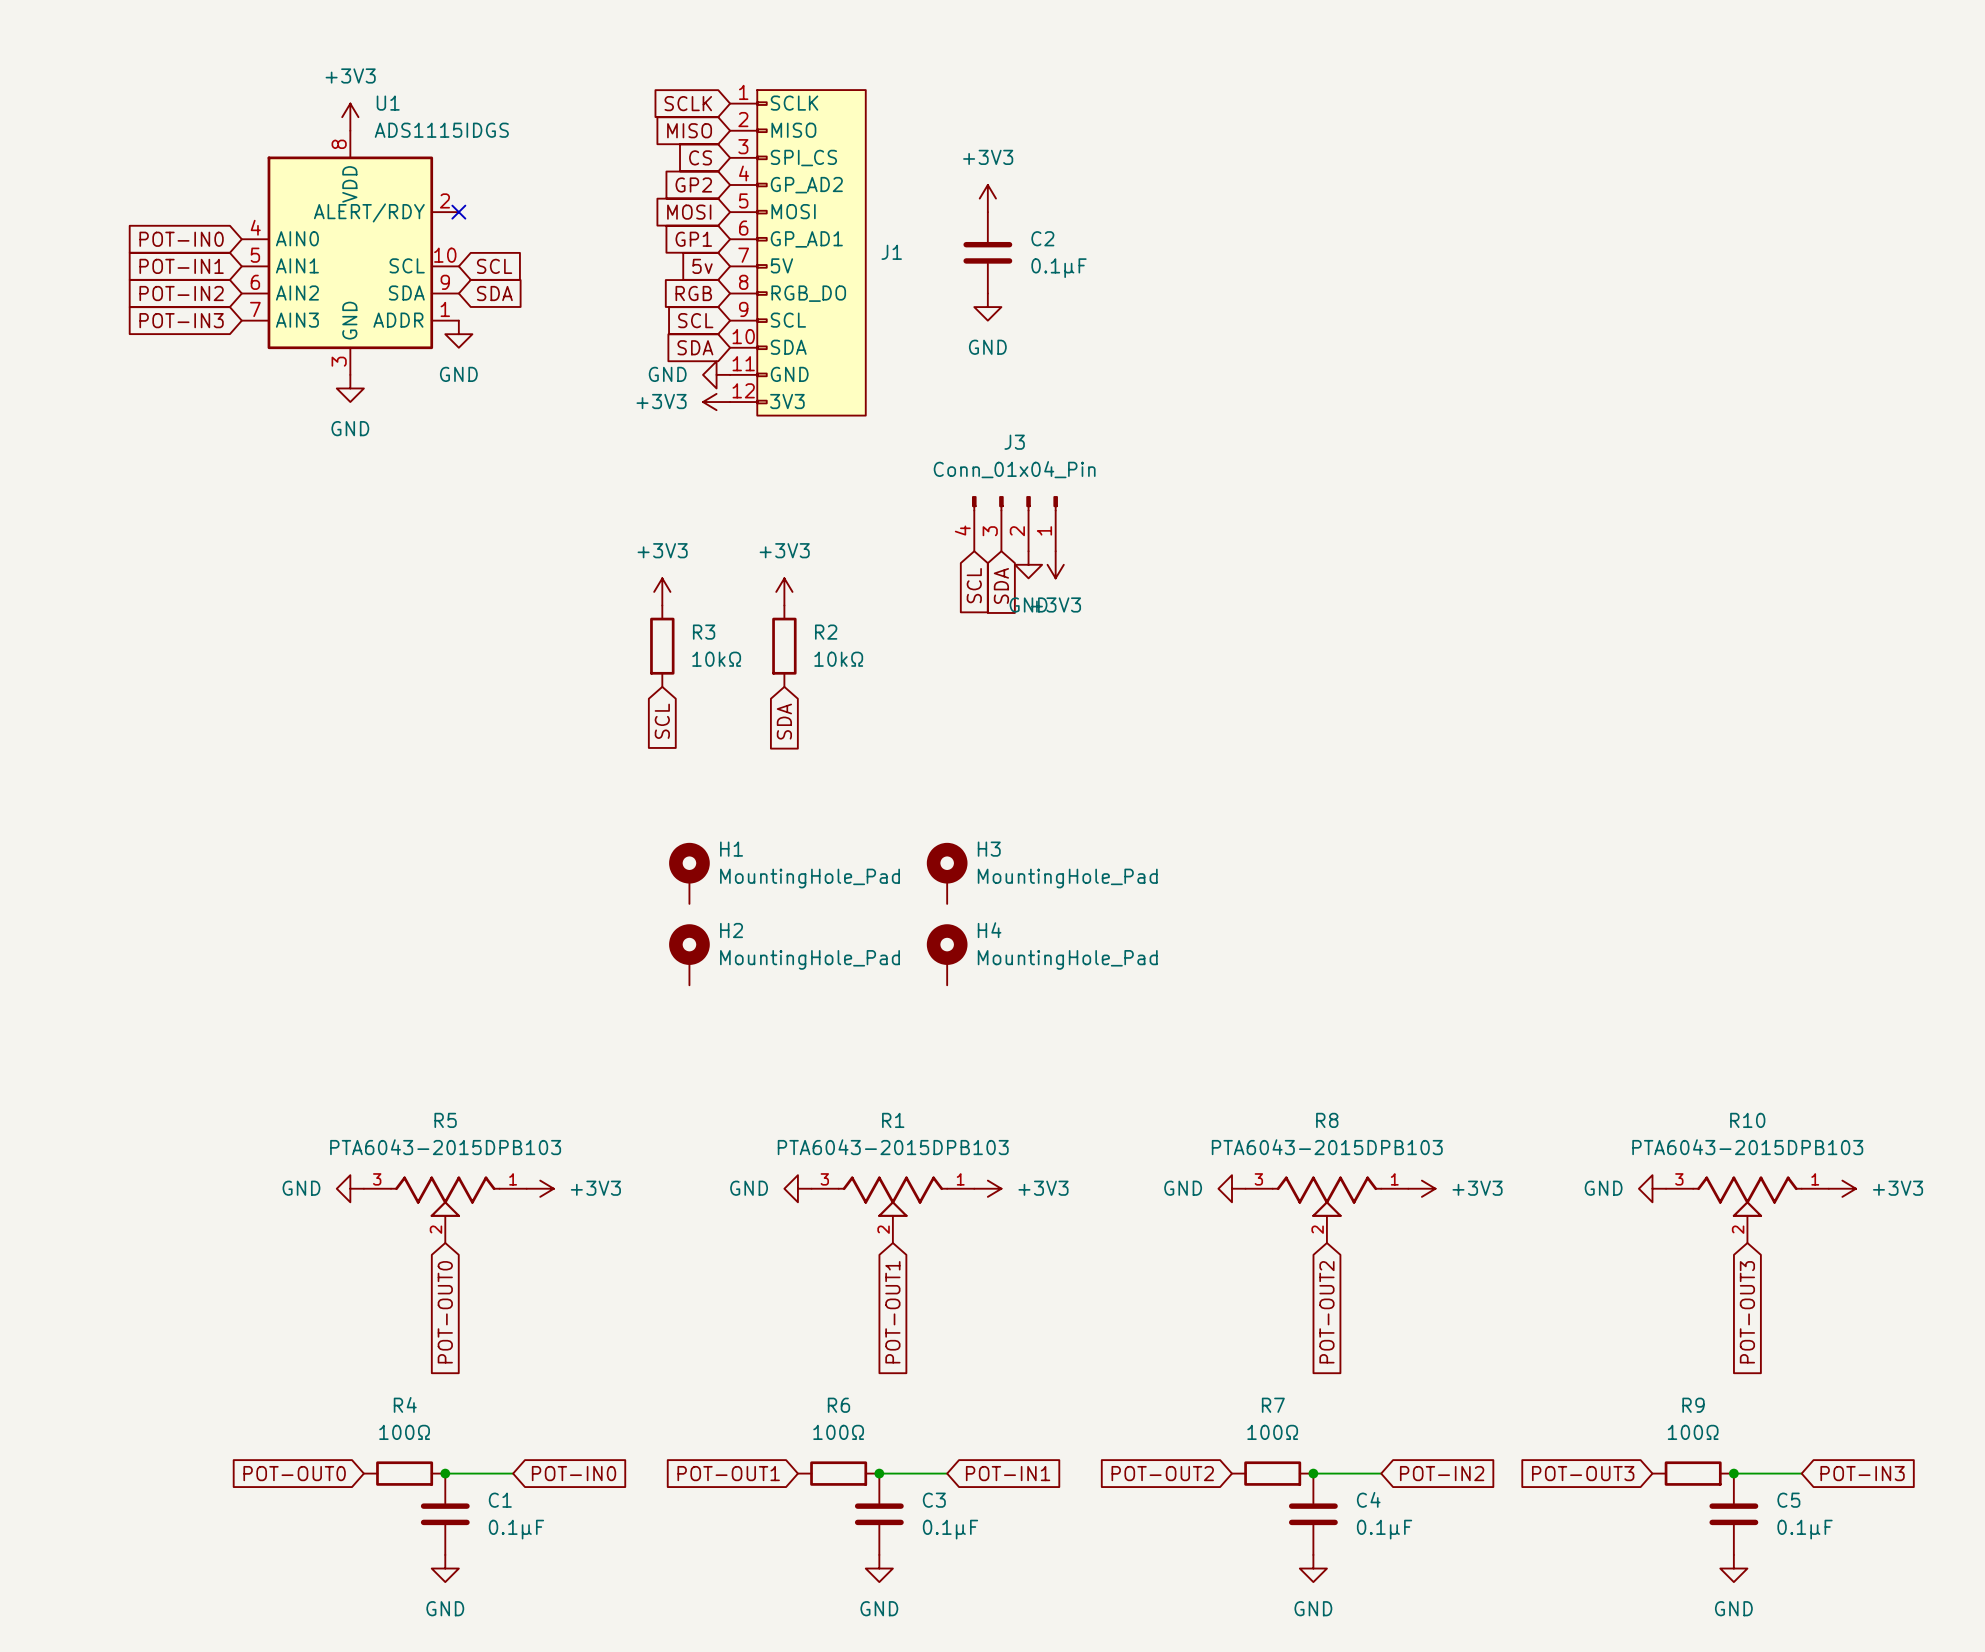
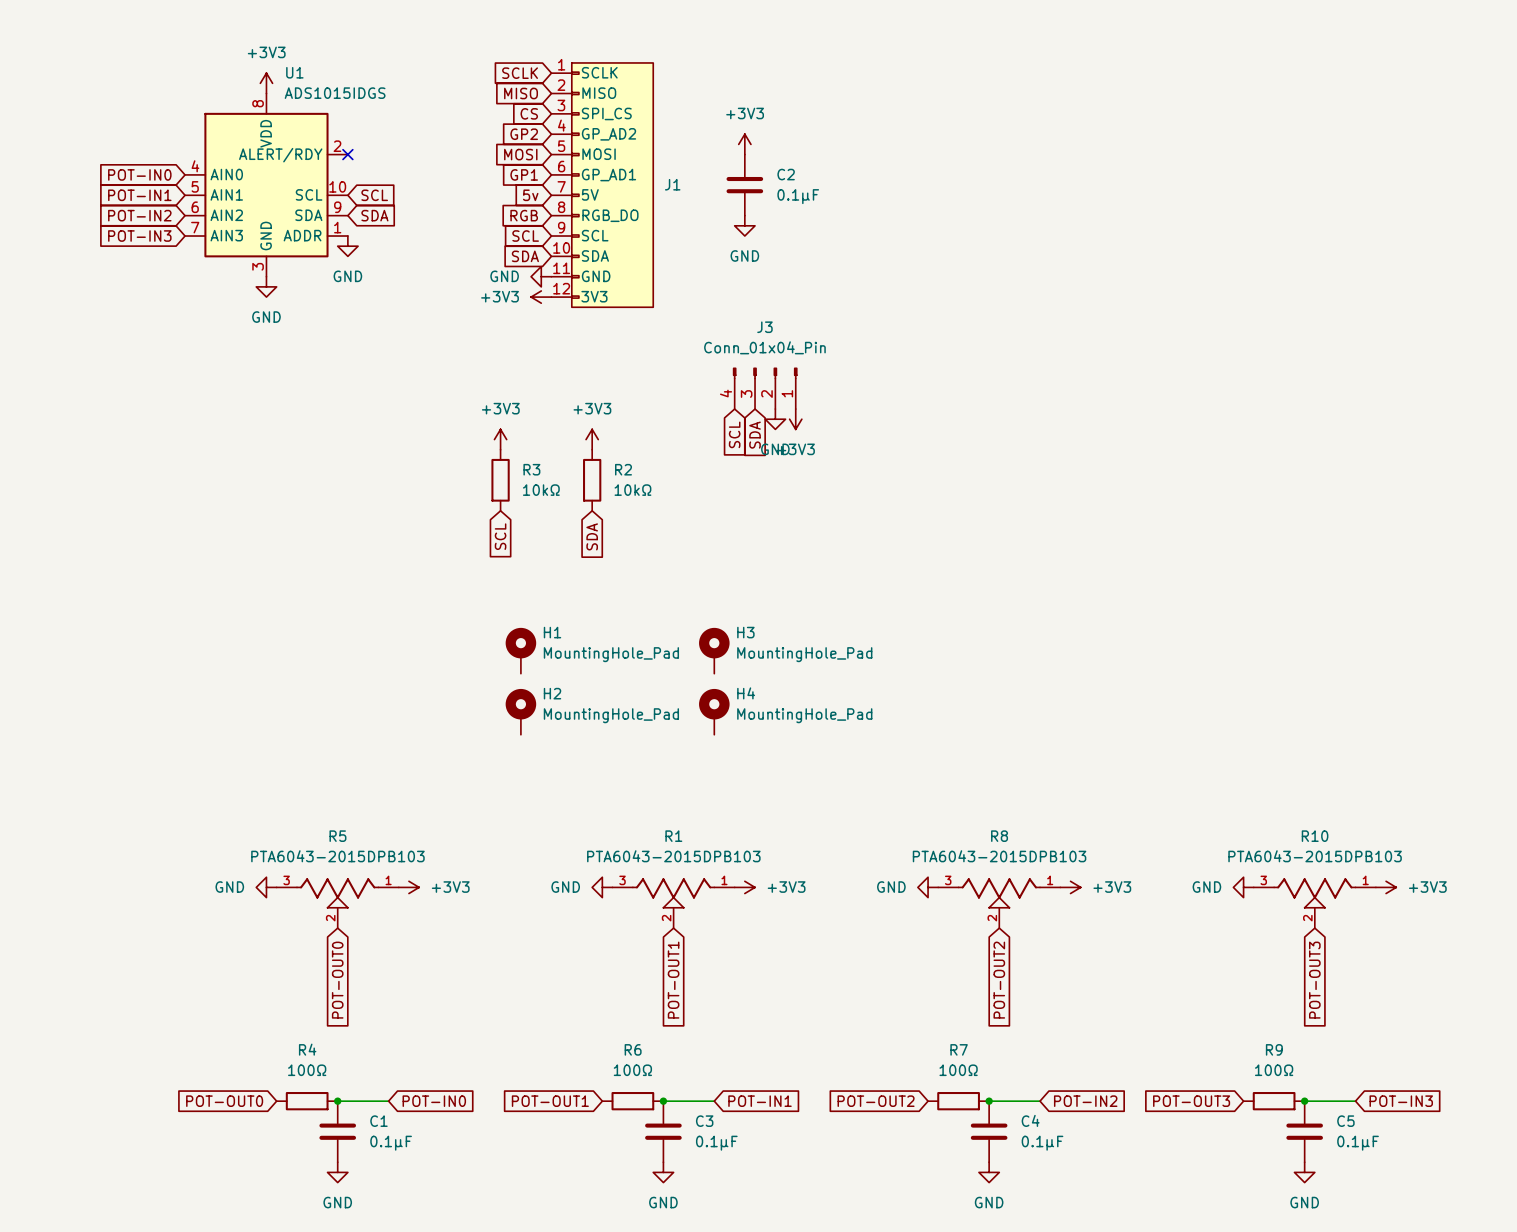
U1 value: ADS1115IDGS (441, 130) -> ADS1015IDGS (335, 93)

